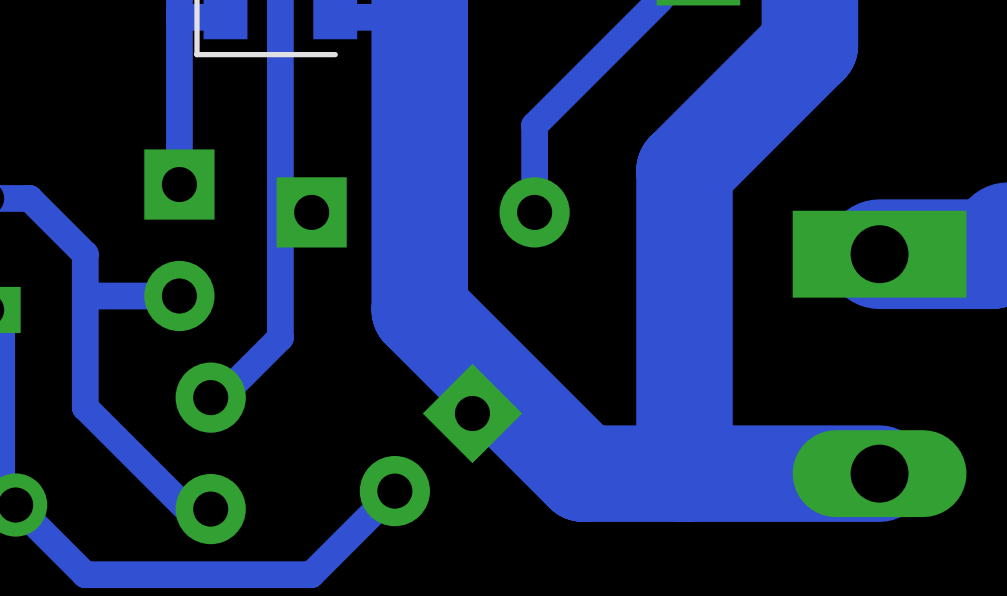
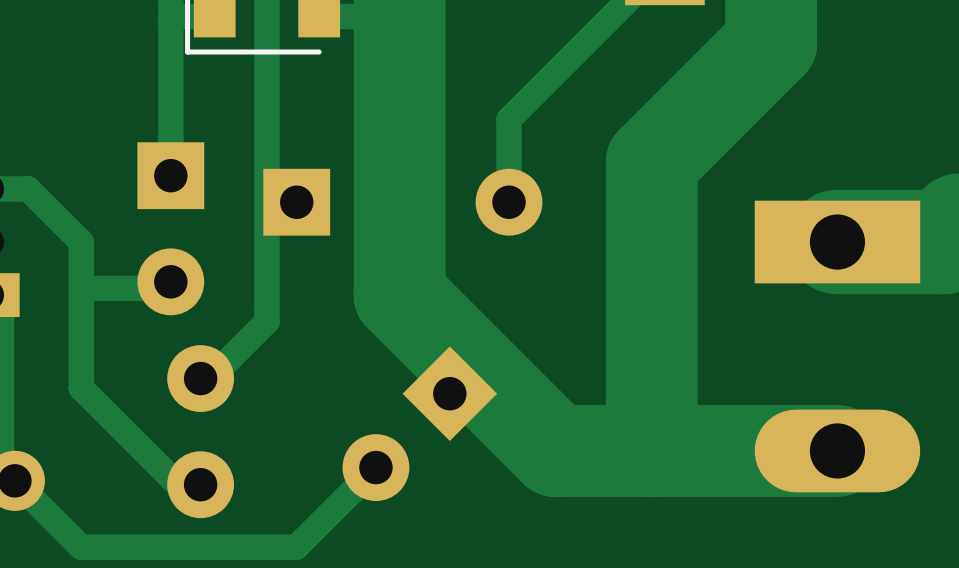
track: (179, 296) (85, 296) -> none
track: none -> (170, 288) (87, 288)

